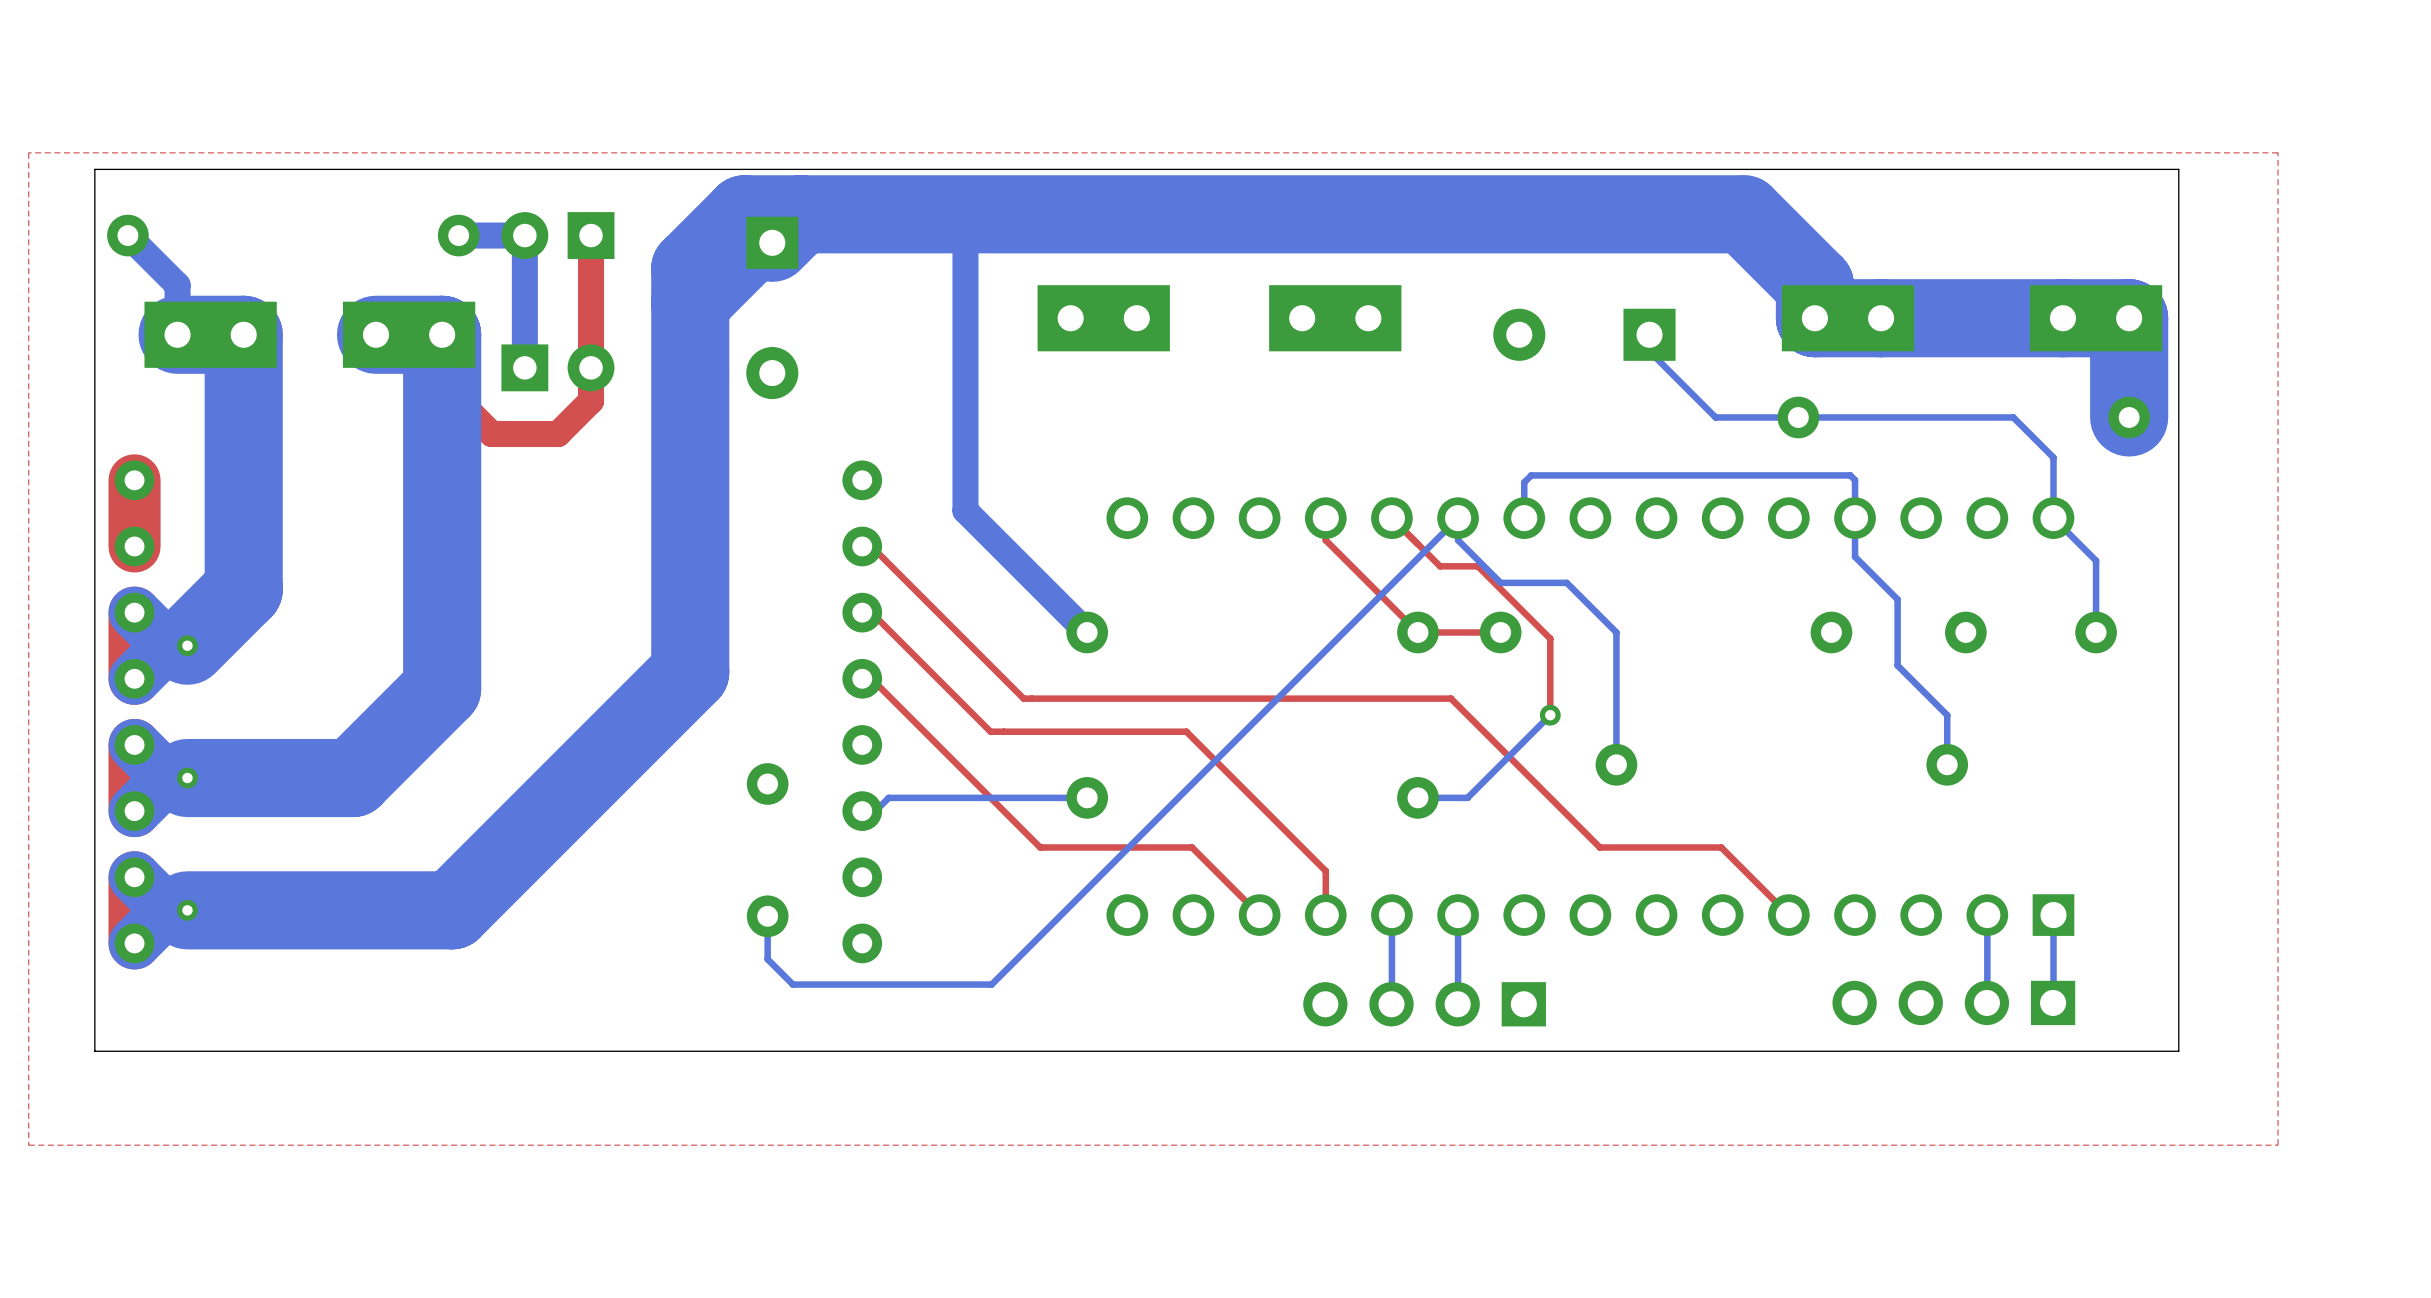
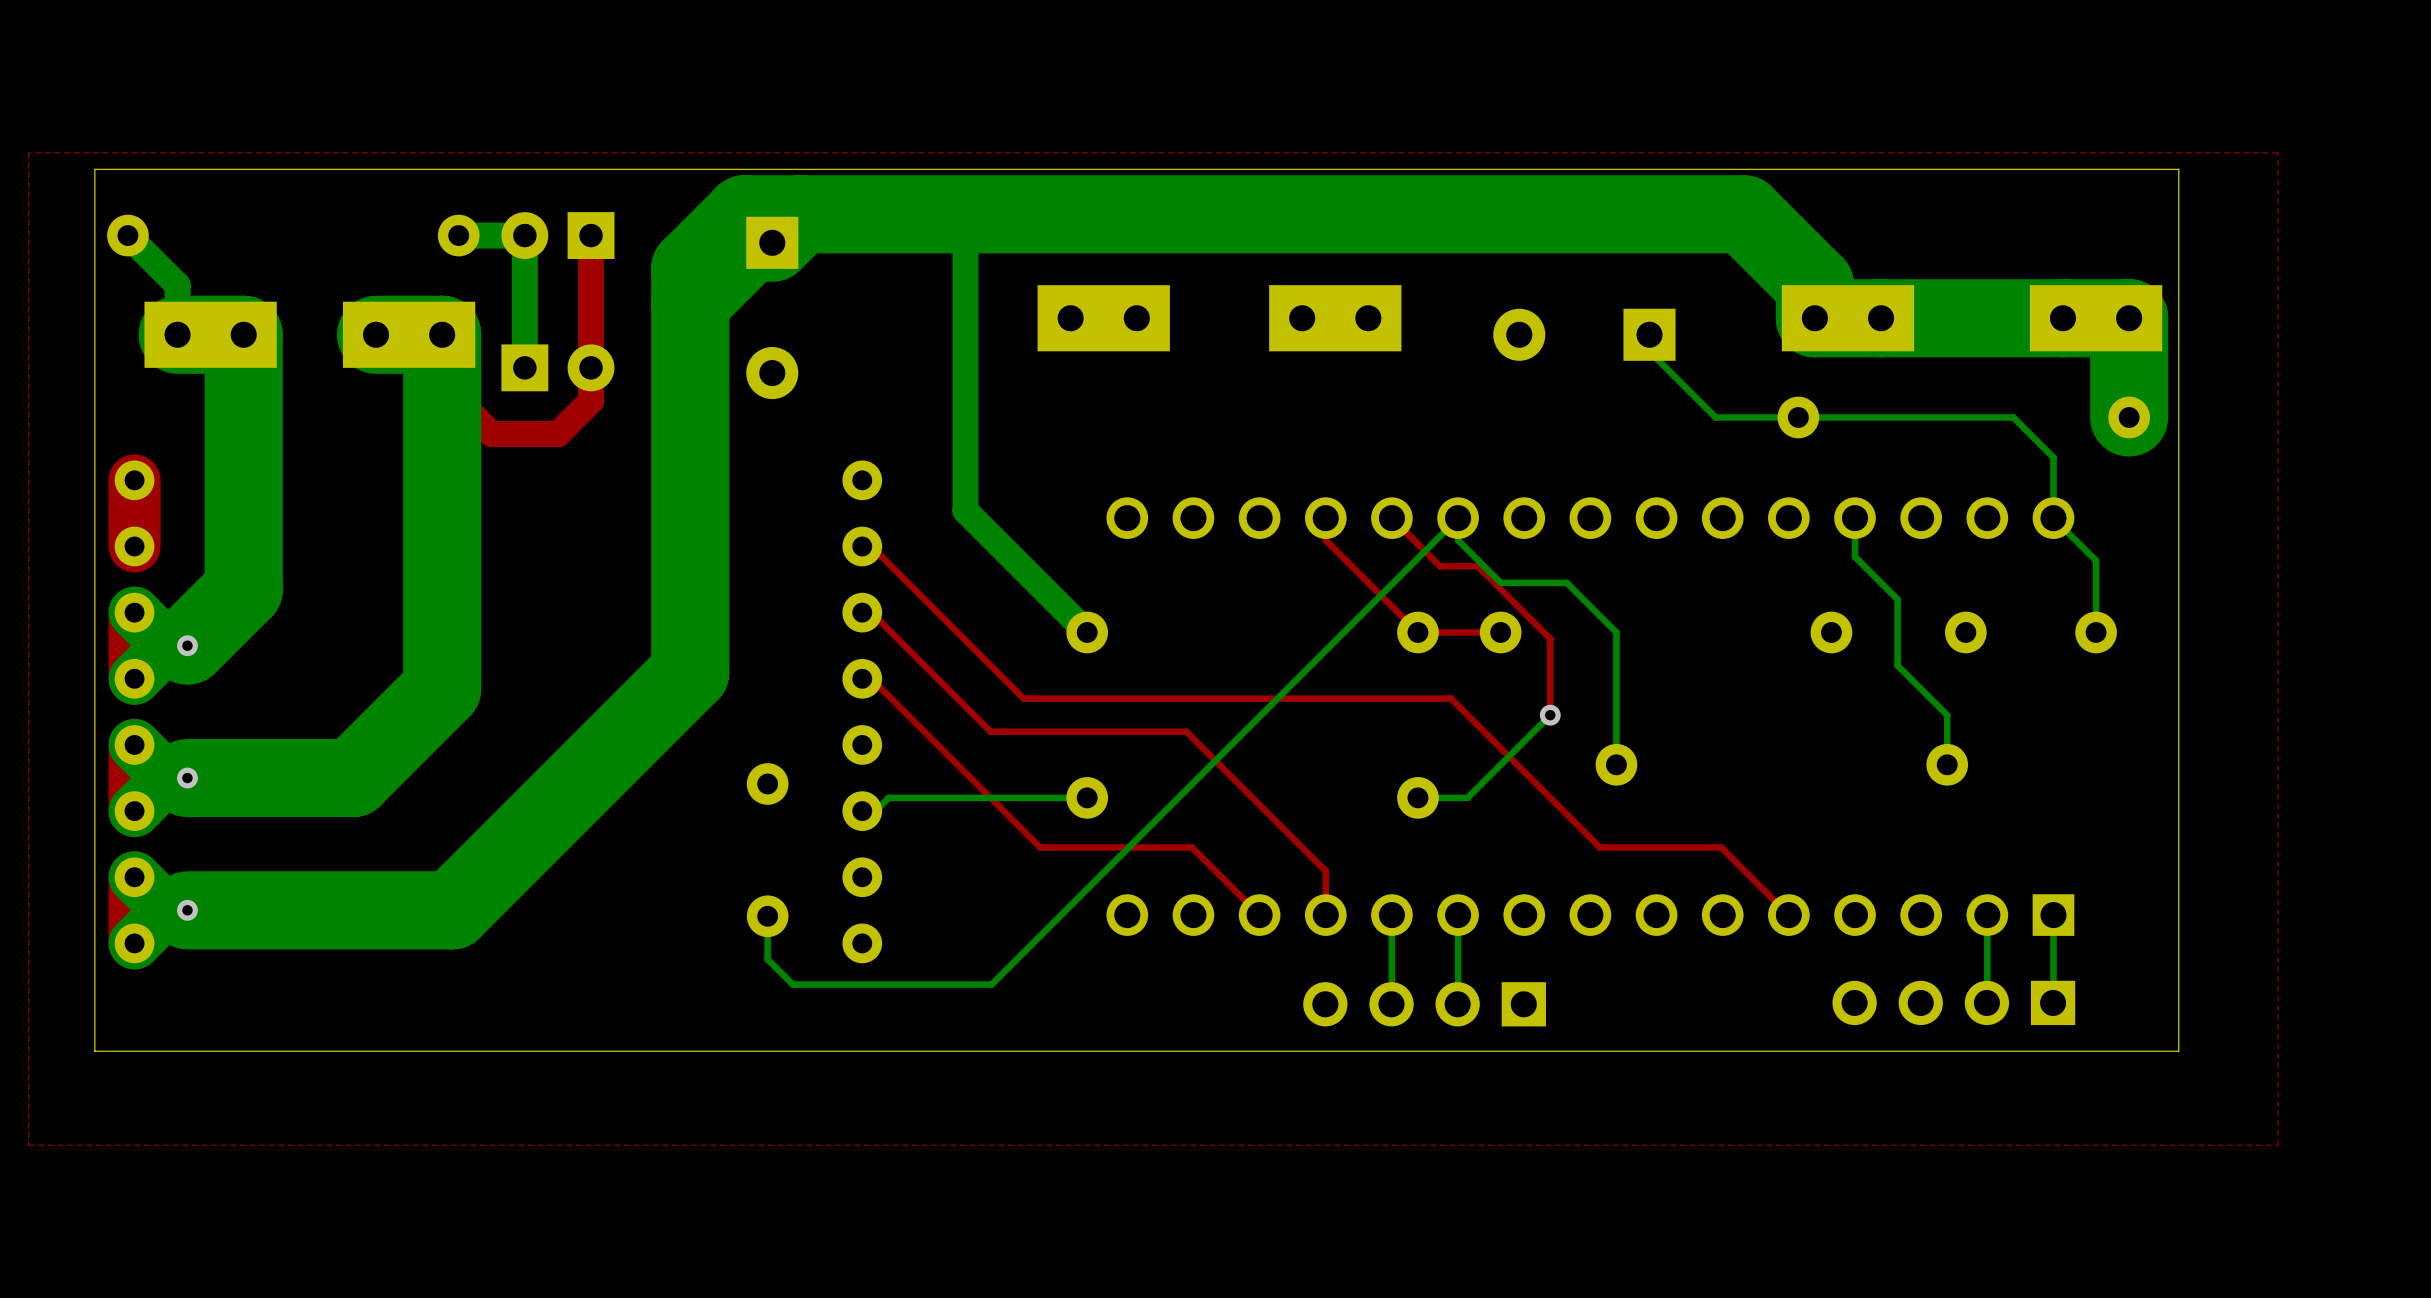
bottom track: (1855, 518) (1855, 480) (1850, 475) (1531, 475) (1524, 482) (1524, 518) -> none

